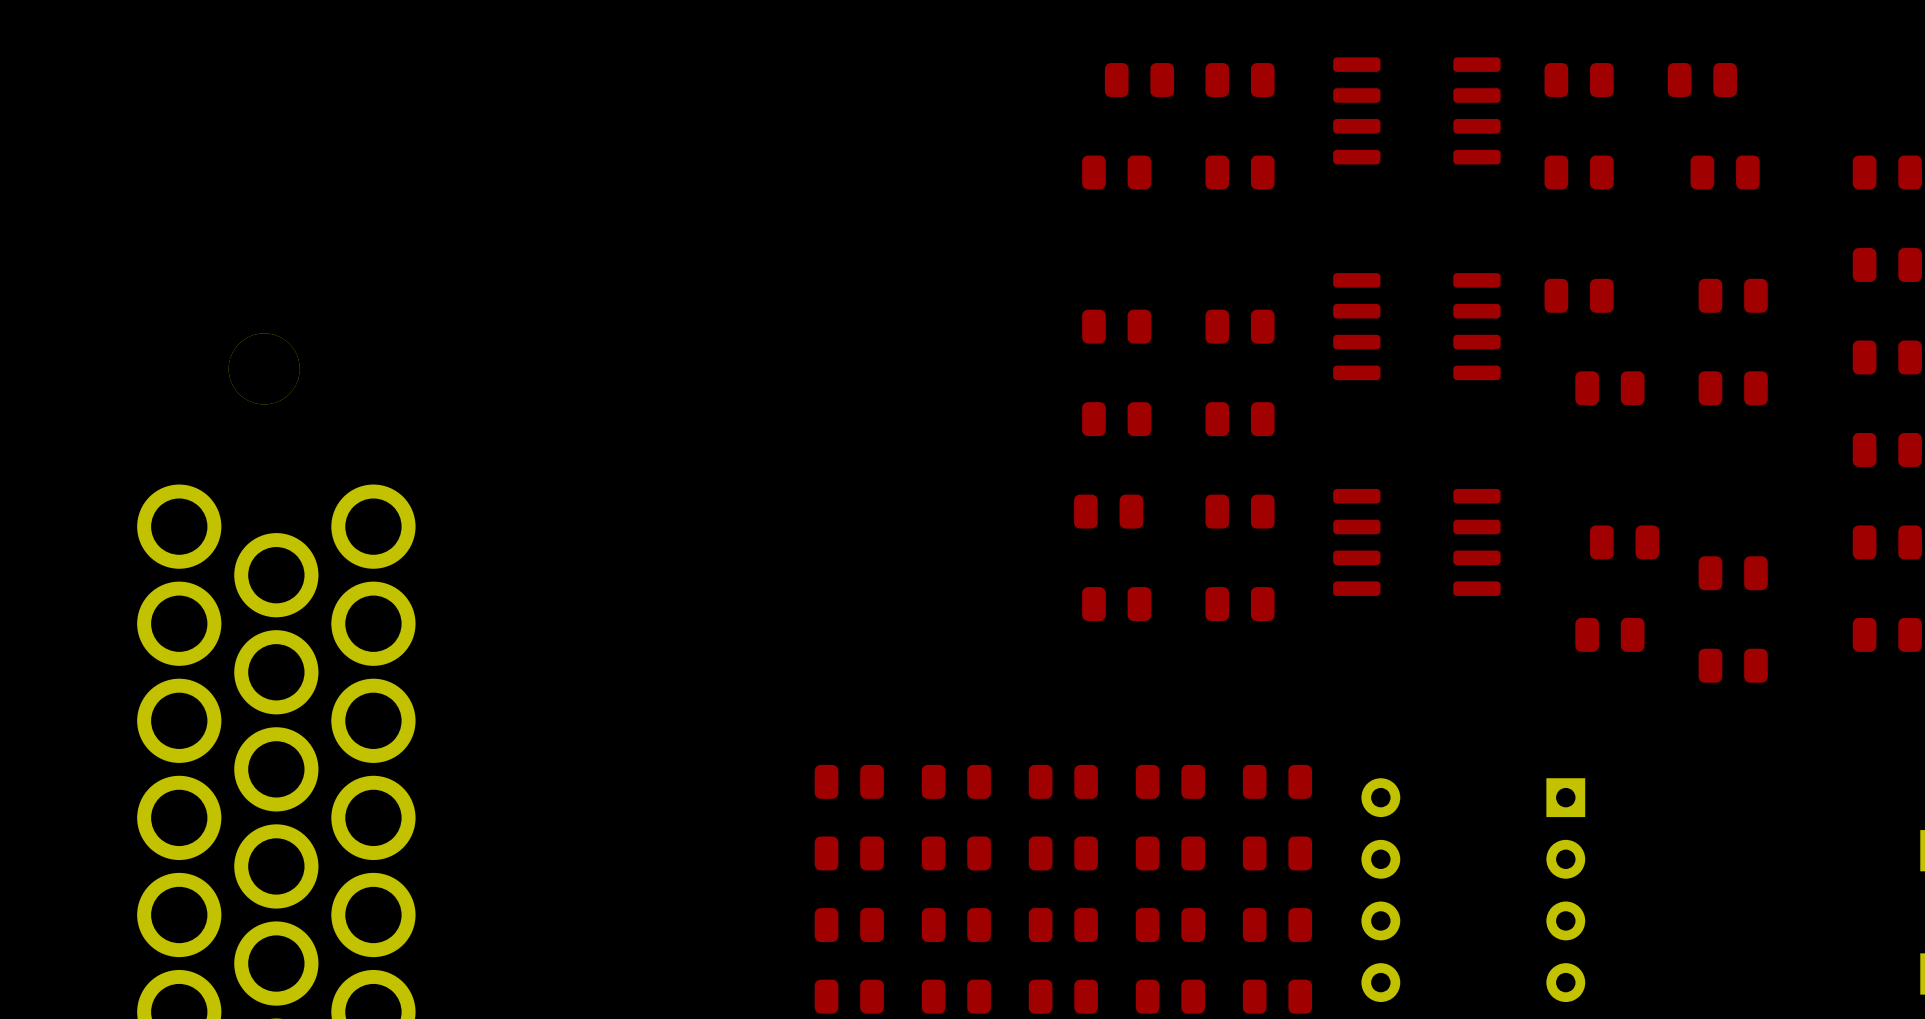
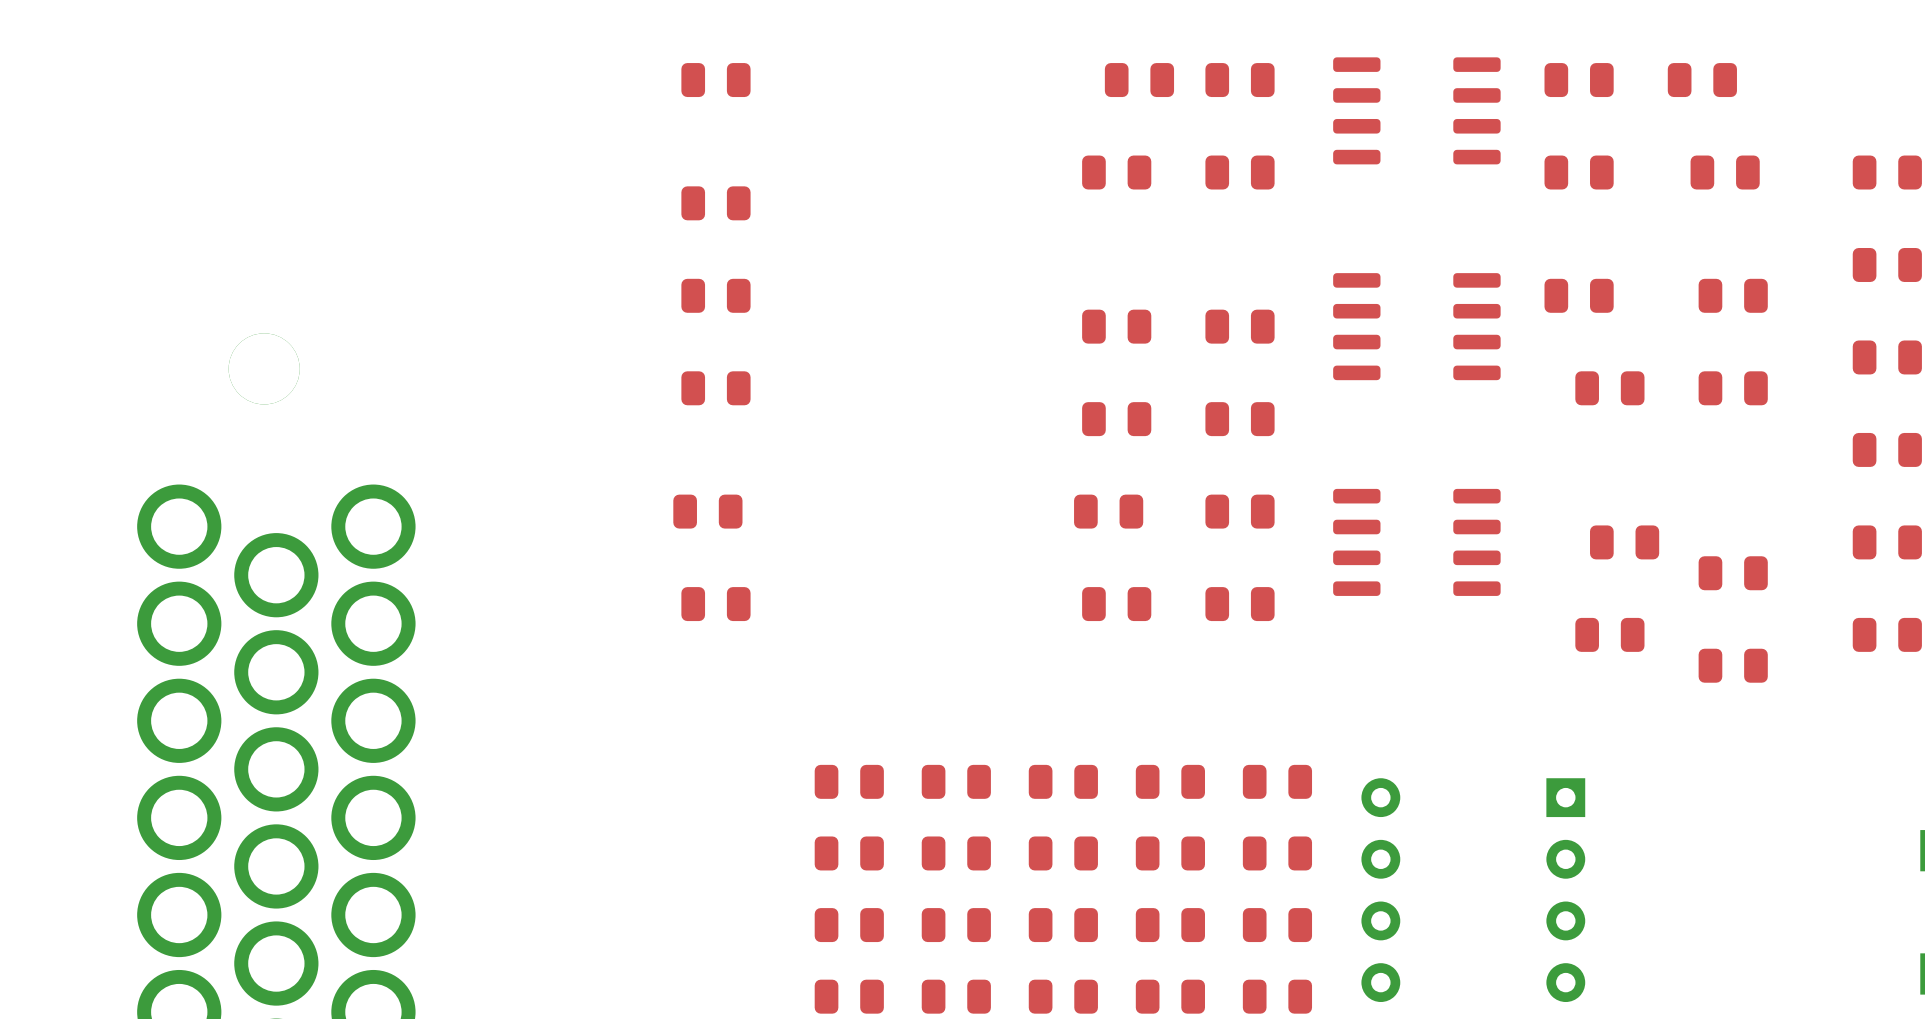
part: none -> (715, 80)
part: none -> (715, 203)
part: none -> (715, 295)
part: none -> (715, 388)
part: none -> (707, 511)
part: none -> (715, 604)

